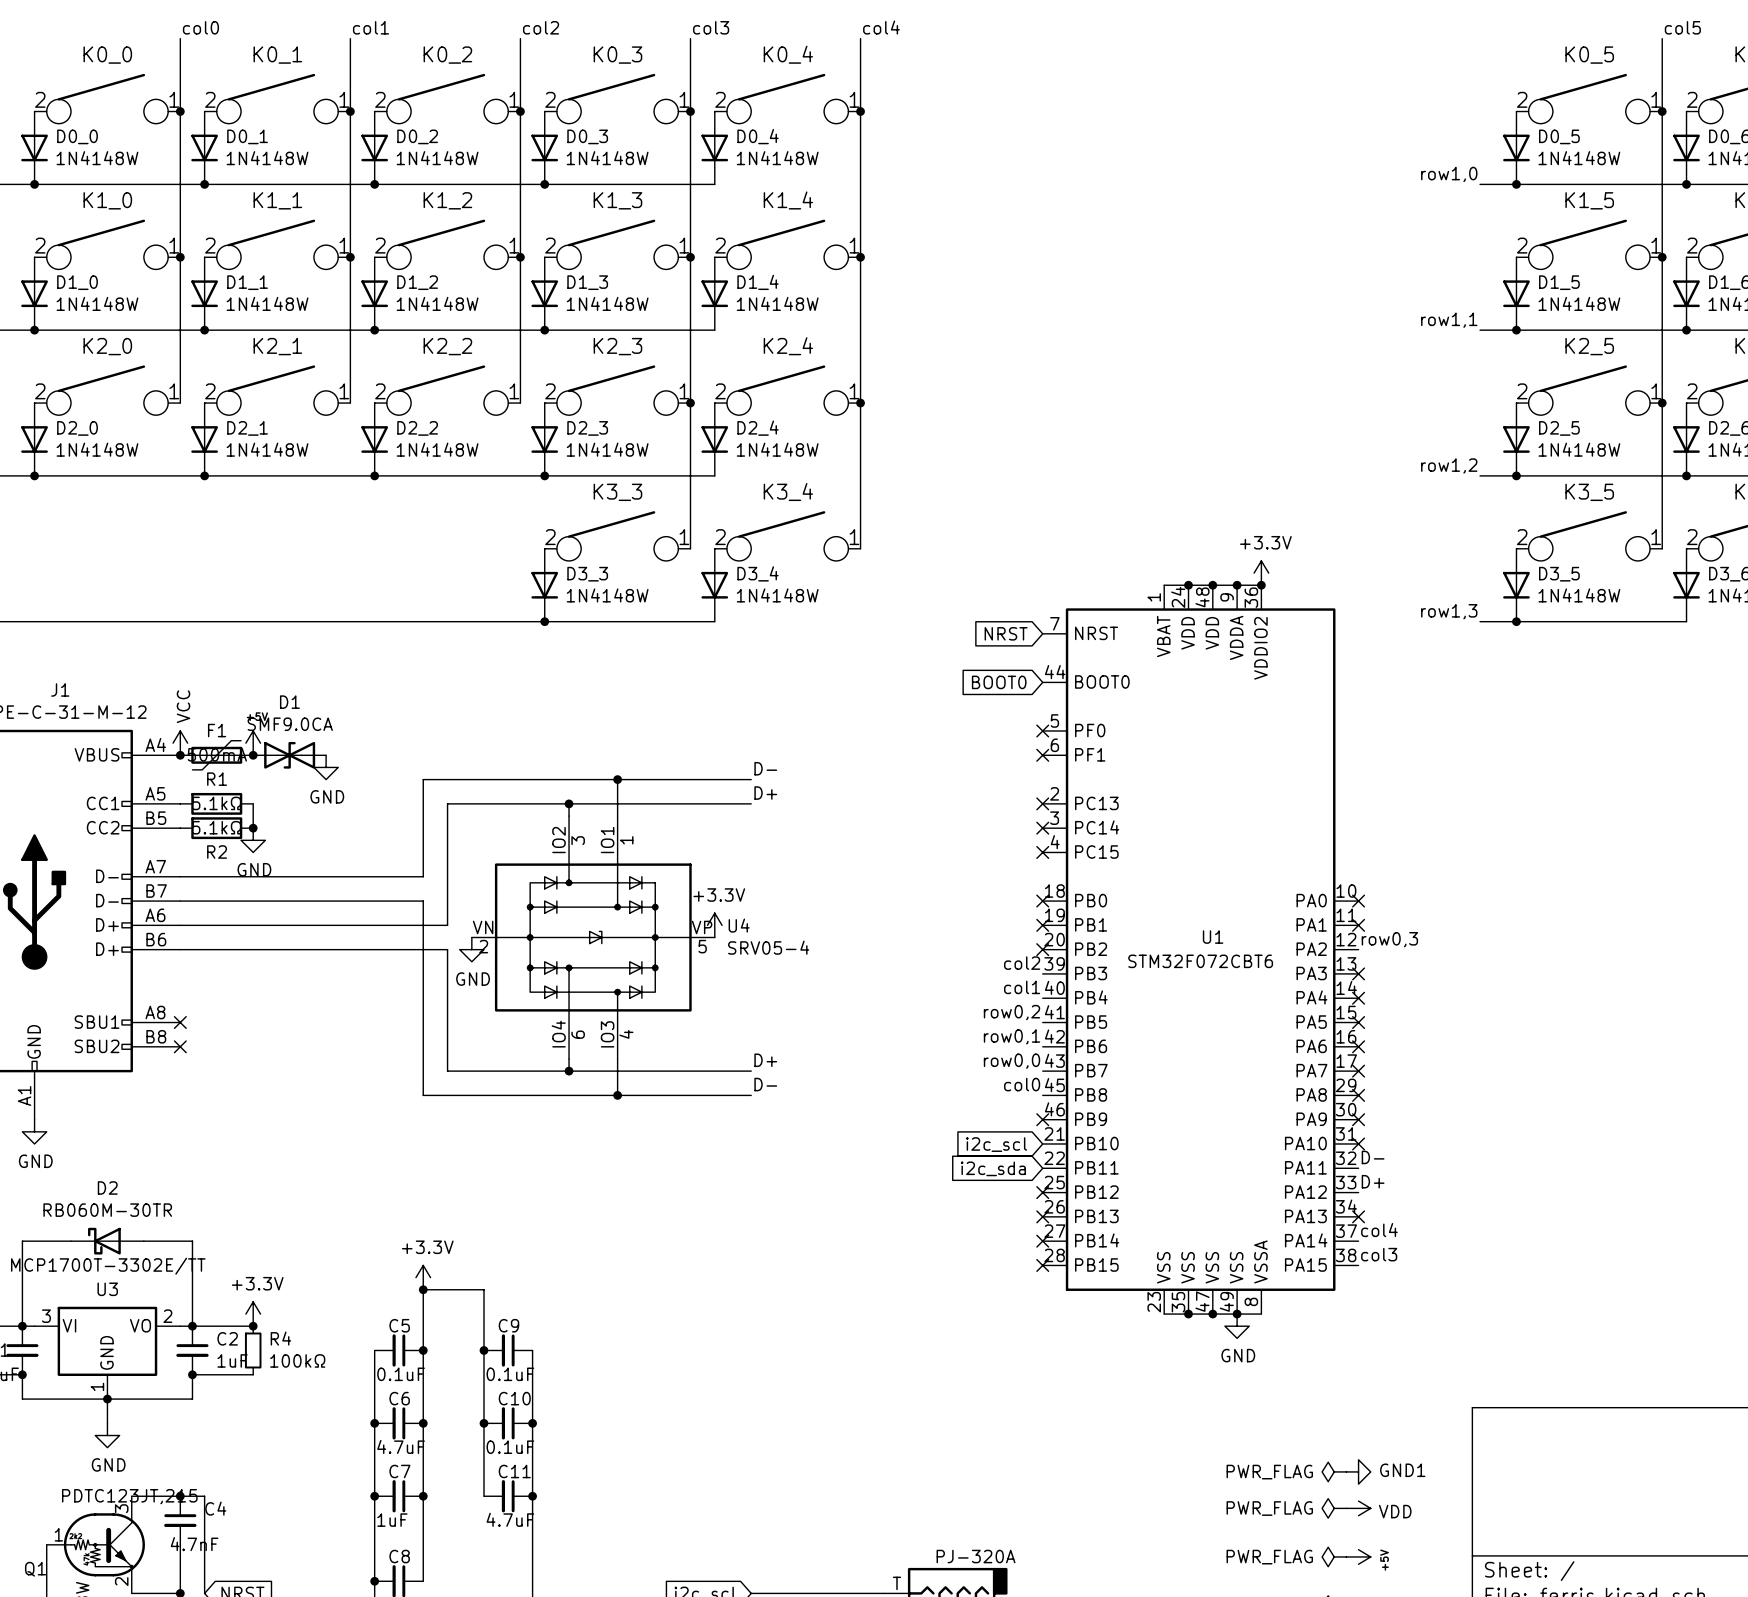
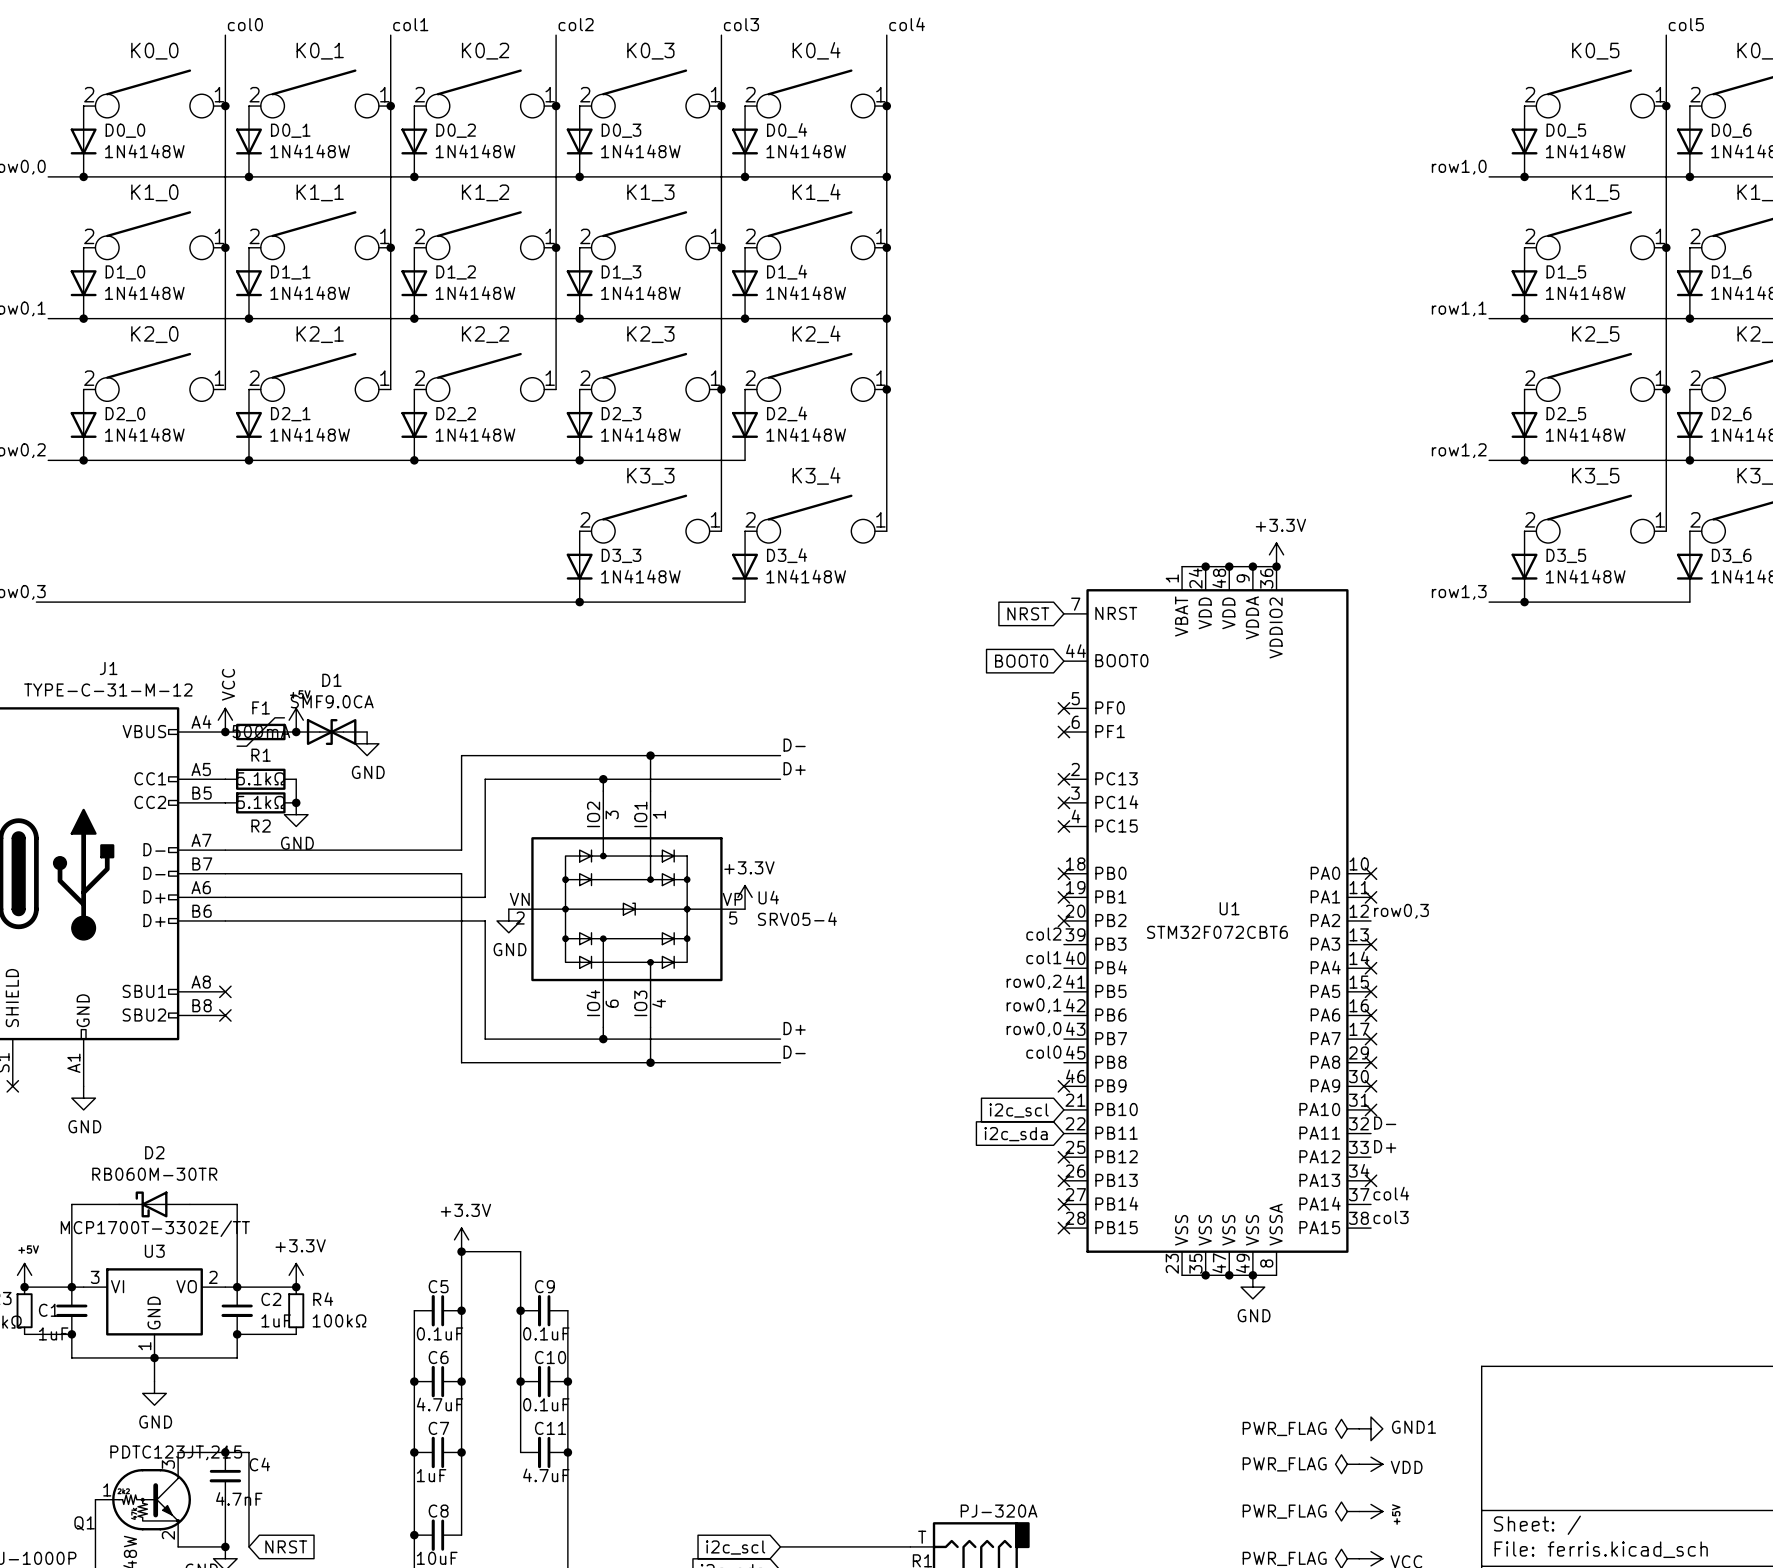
wire: none -> (745, 176) (886, 176)
junction: none -> (745, 176)
junction: none -> (886, 176)
wire: none -> (745, 318) (886, 318)
junction: none -> (745, 318)
junction: none -> (886, 318)

